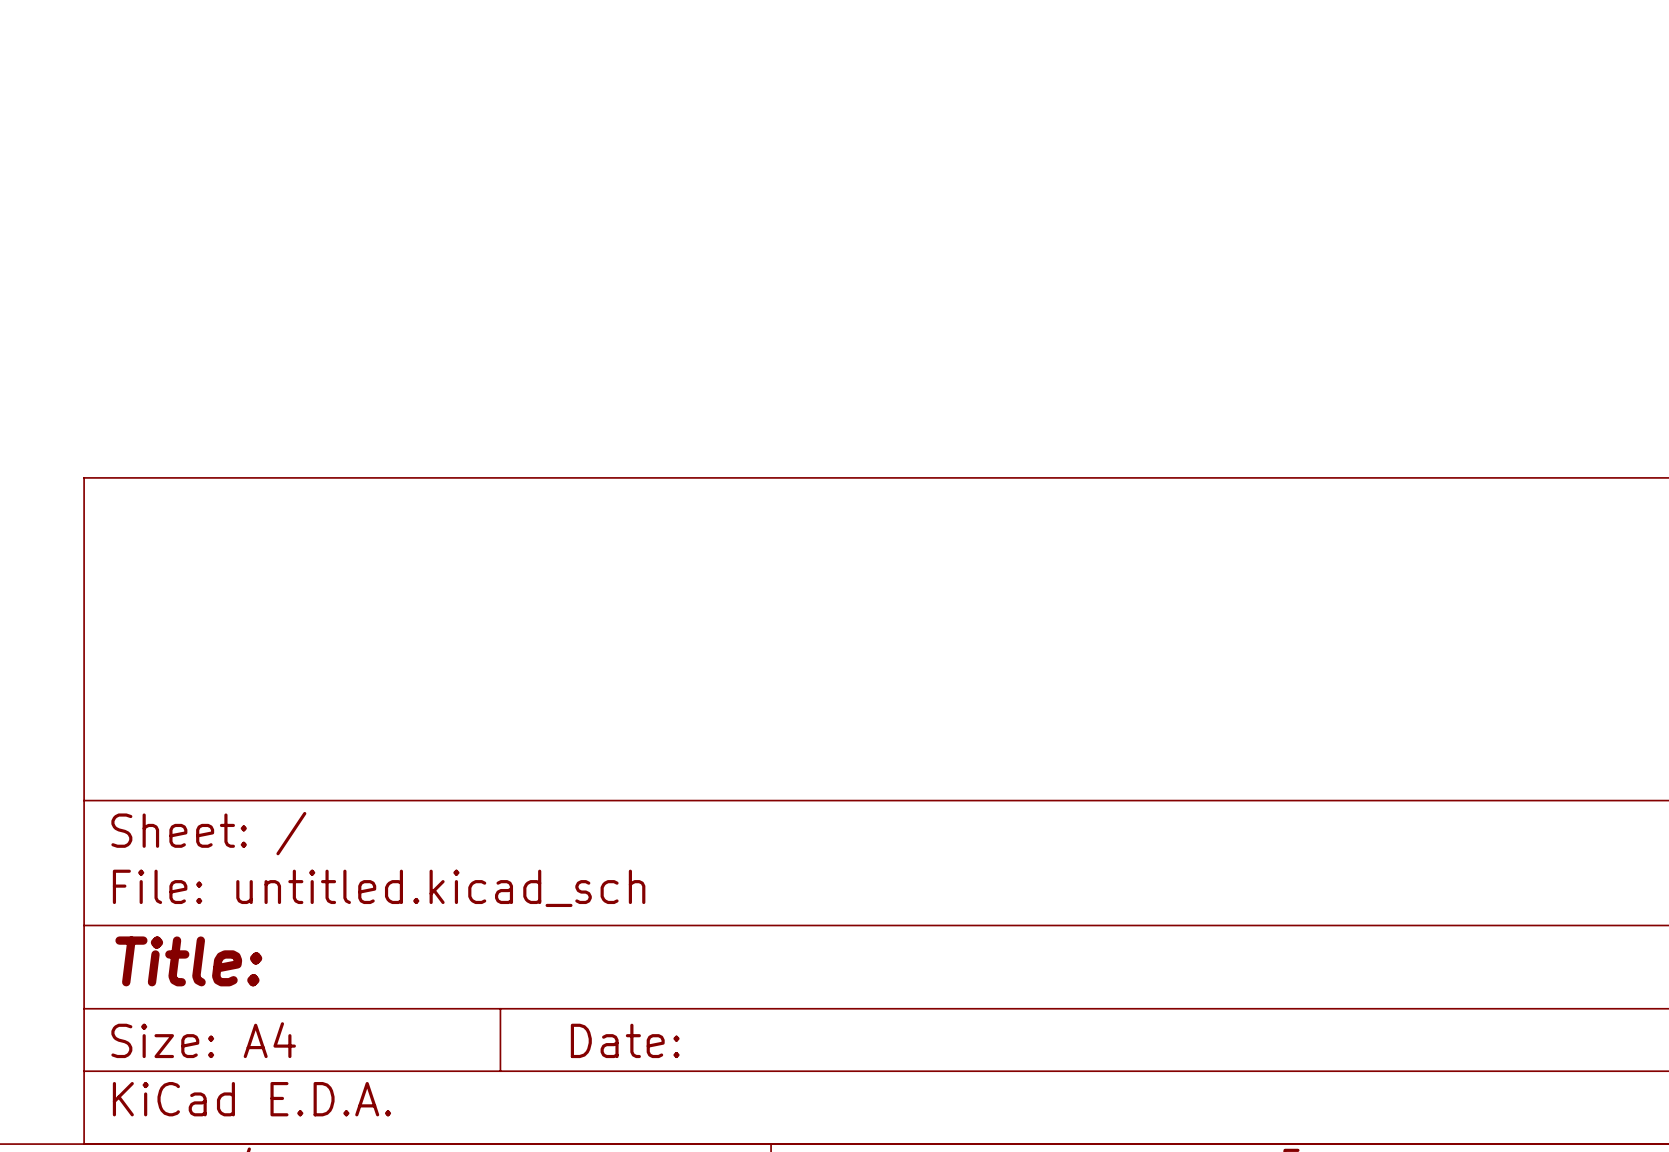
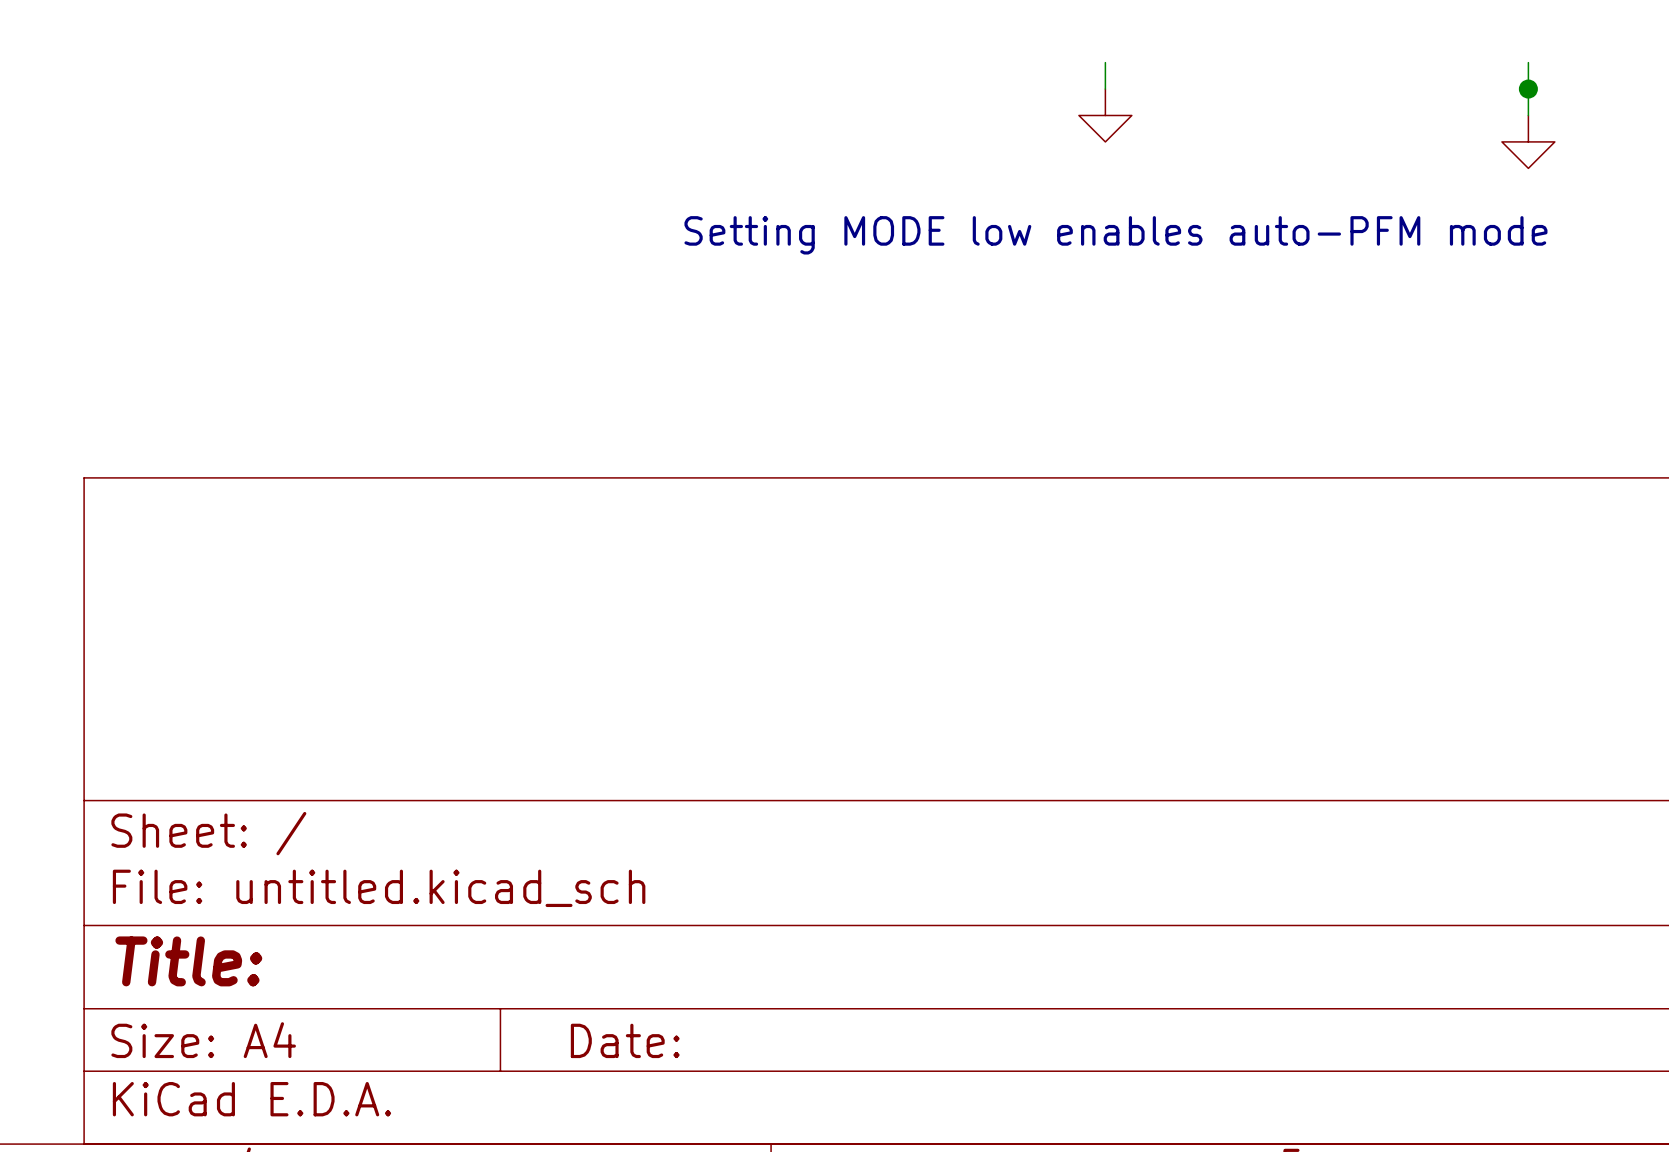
wire: none -> (1105, 62) (1105, 89)
wire: none -> (1528, 62) (1528, 115)
junction: none -> (1528, 89)
power symbol: none -> (1105, 115)
power symbol: none -> (1528, 141)
text: none -> Setting MODE low enables auto-PFM mode (1115, 235)

